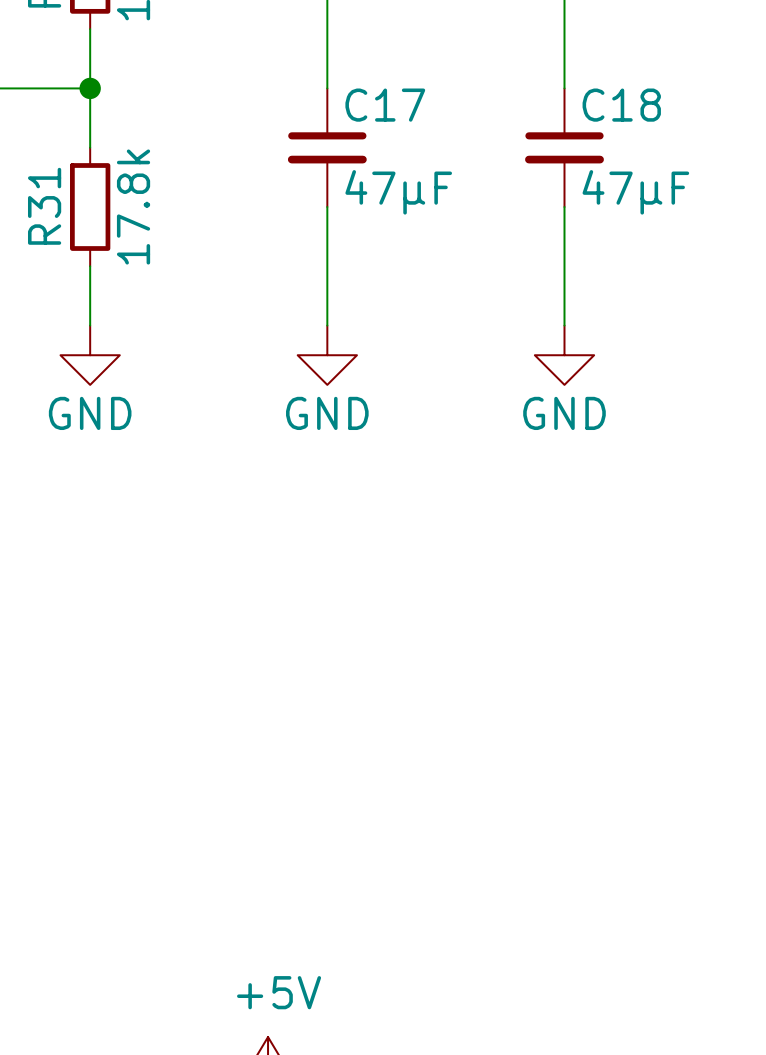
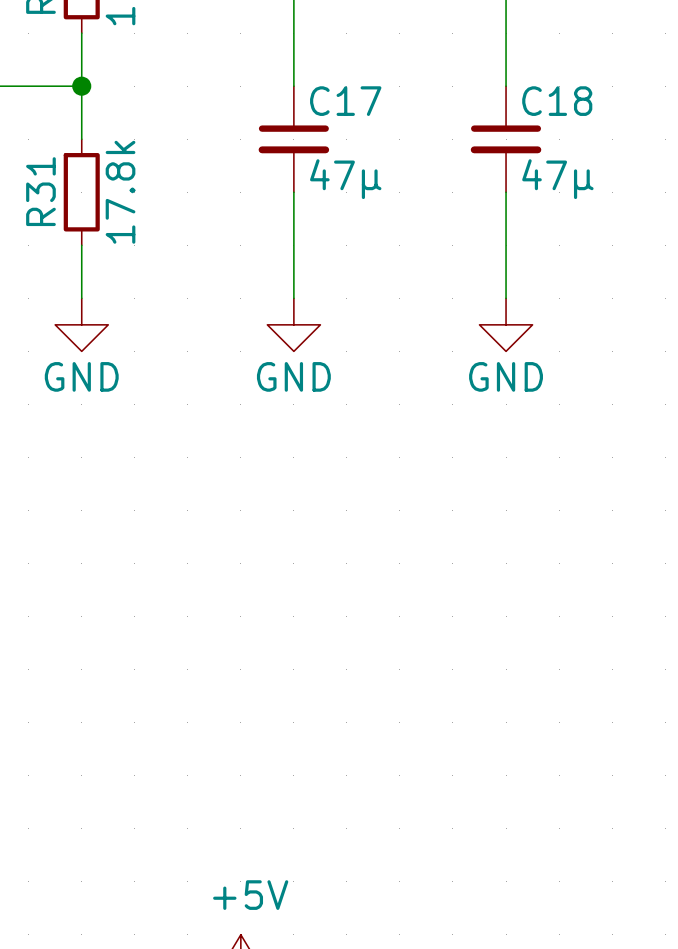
C17 value: 47µF (398, 192) -> 47µ (345, 179)
C18 value: 47µF (635, 192) -> 47µ (557, 179)

